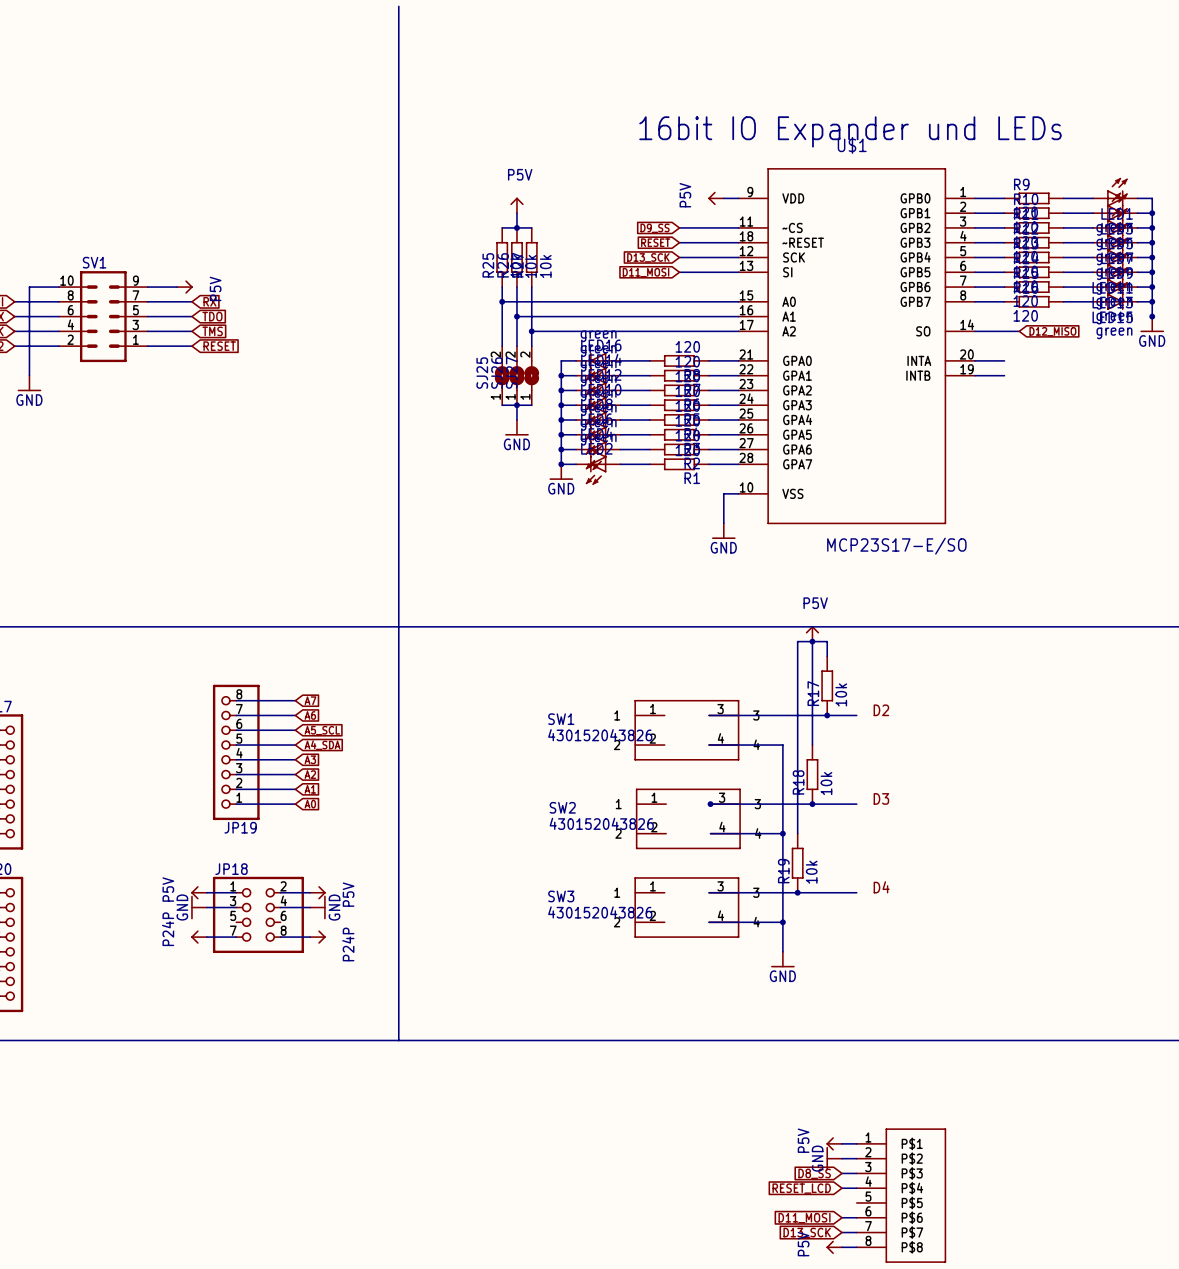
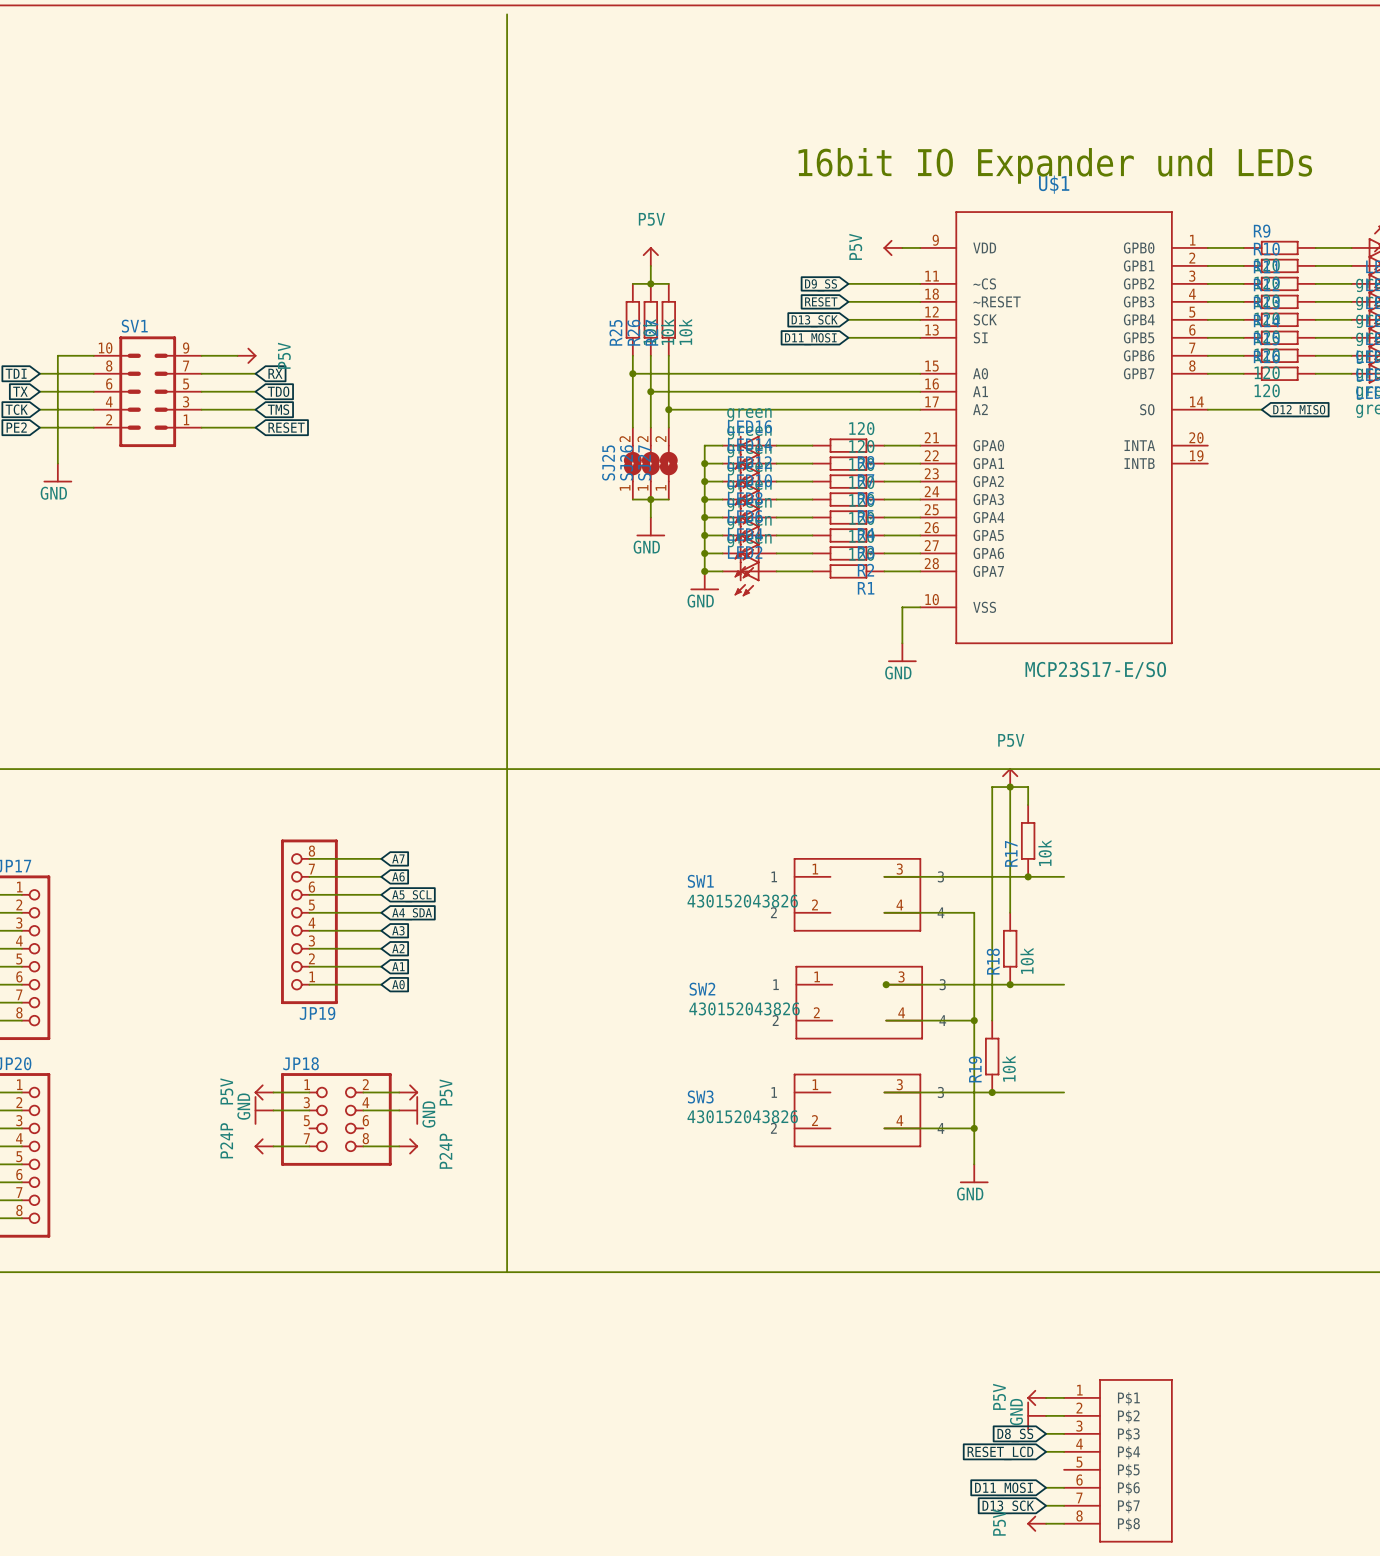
wire: (974, 360) (1004, 360) -> none
wire: (974, 375) (1004, 375) -> none
label: D2 (881, 710) -> none
label: D3 (881, 798) -> none
label: D4 (881, 887) -> none

